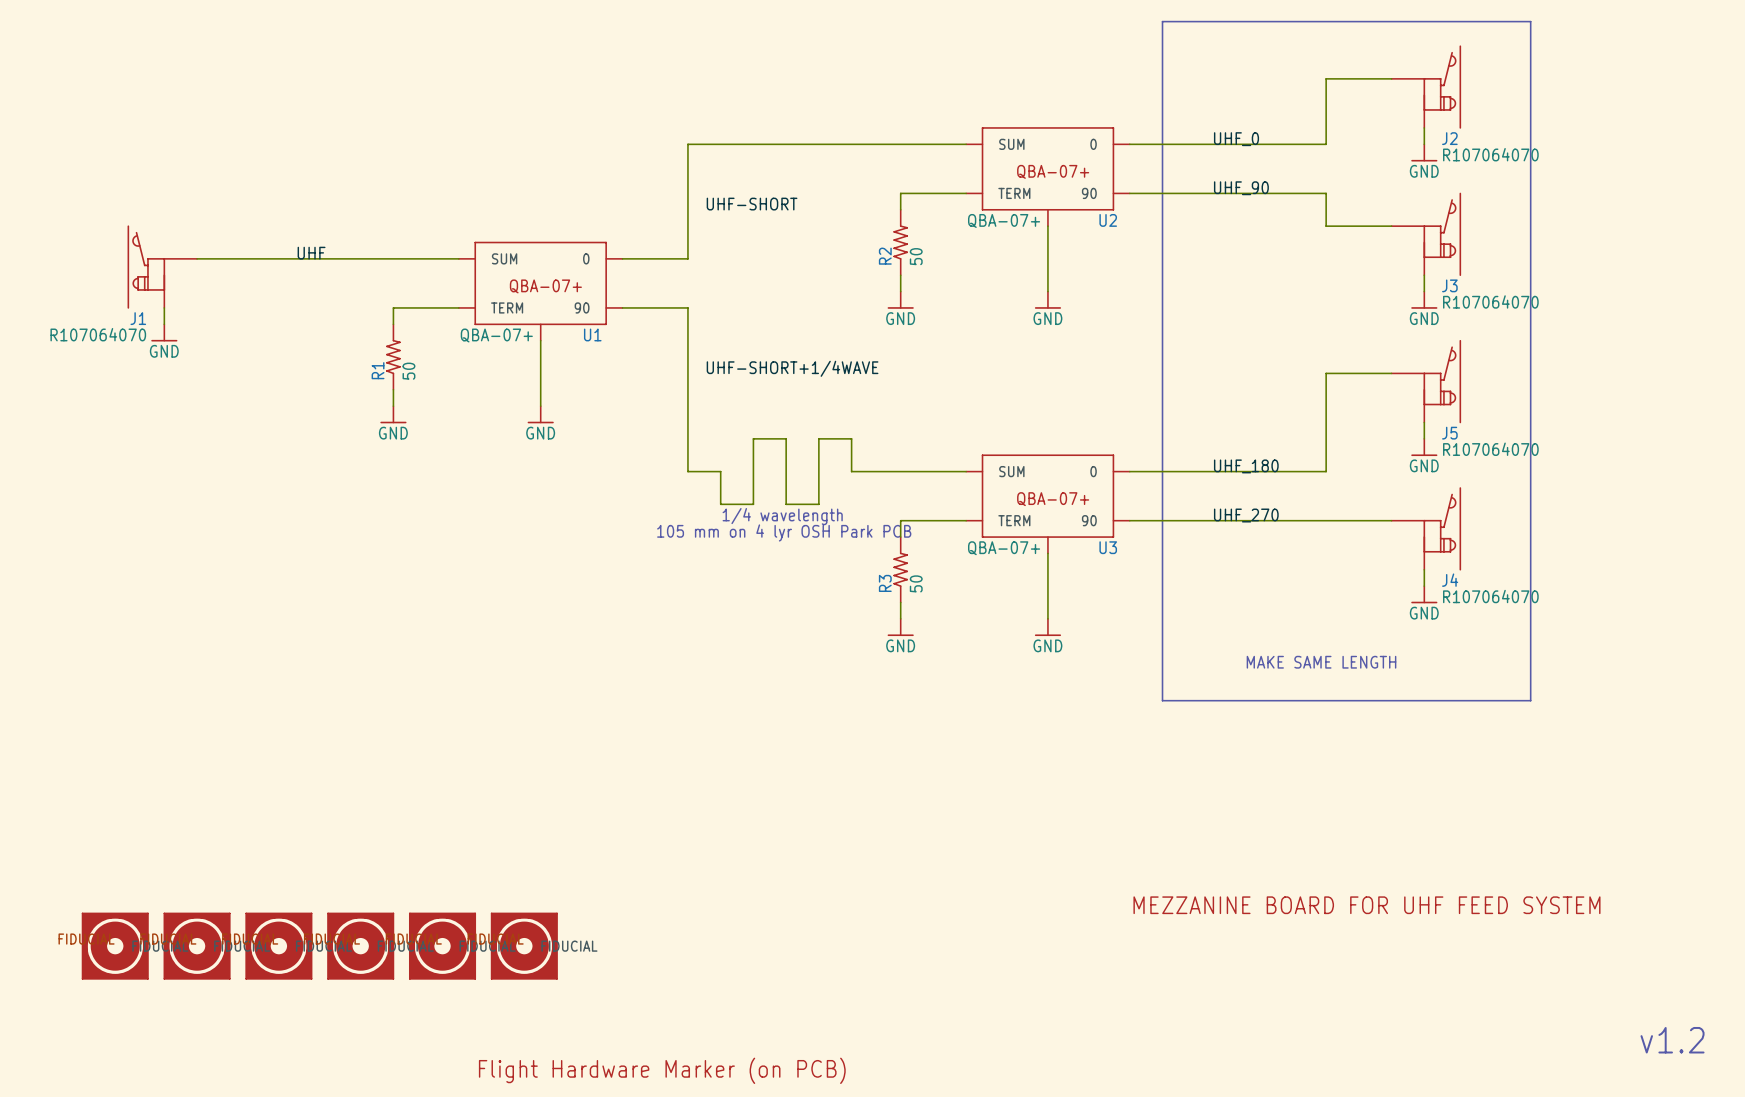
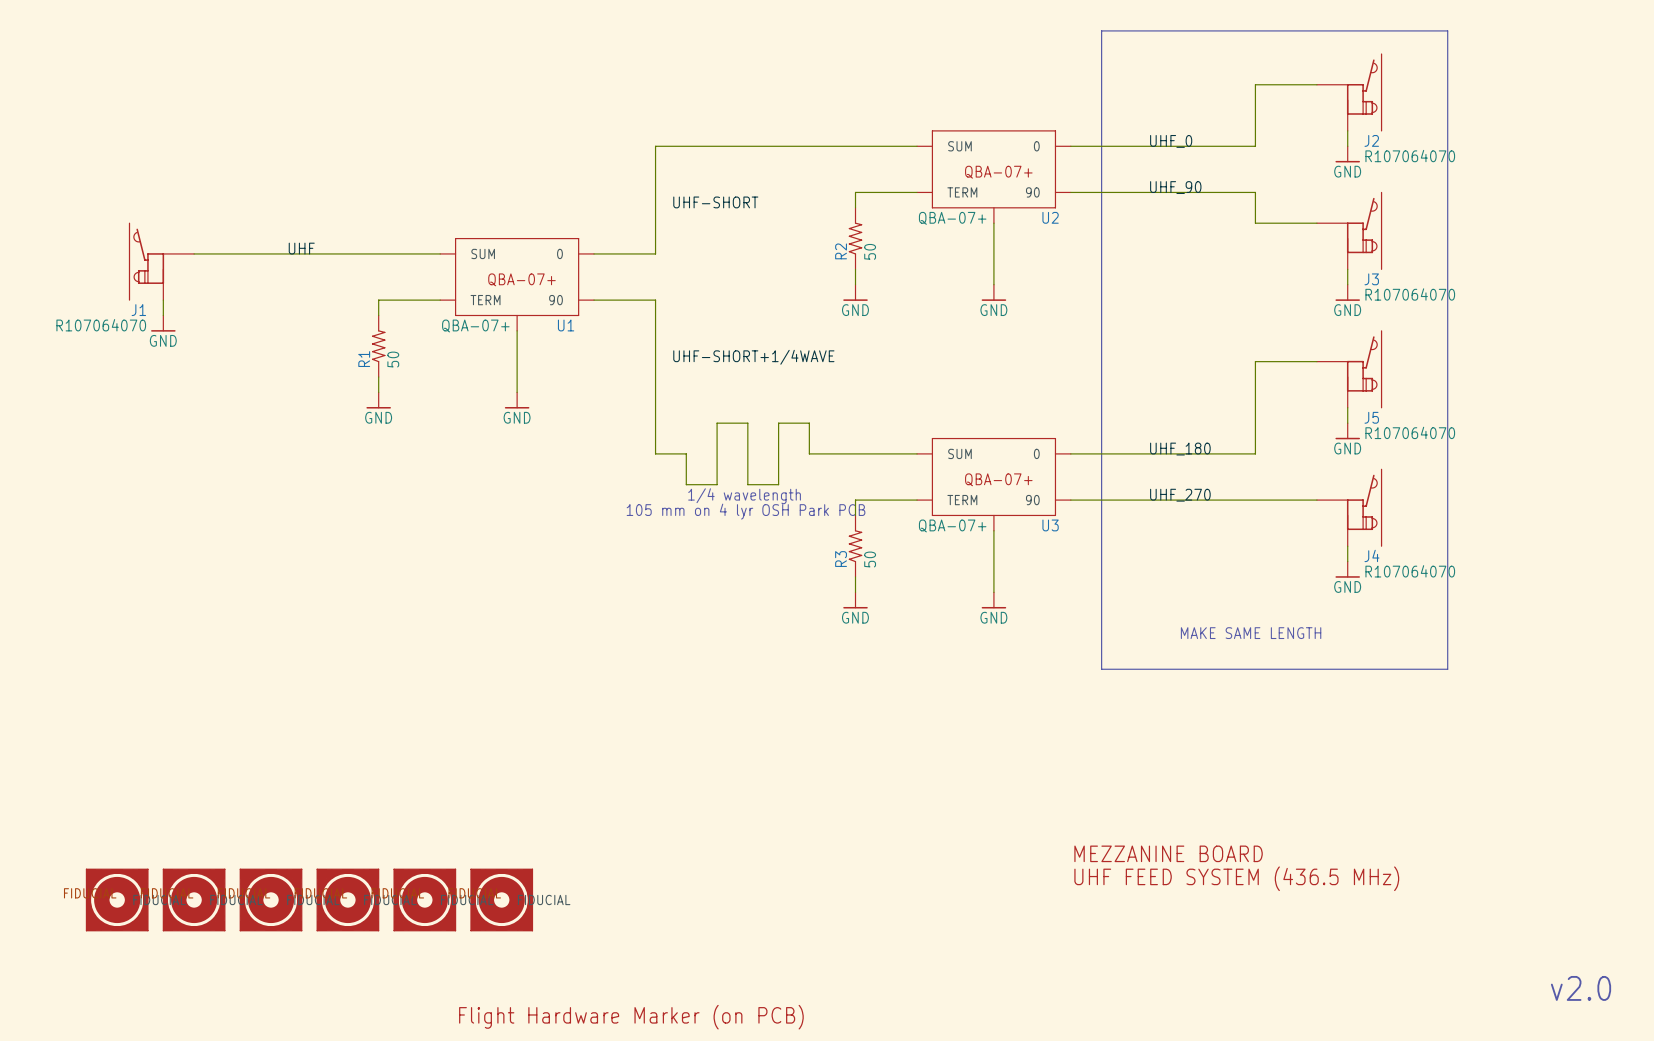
text: none -> MEZZANINE BOARD (1168, 853)
text: MEZZANINE BOARD FOR UHF FEED SYSTEM (1366, 905) -> none
text: none -> UHF FEED SYSTEM (436.5 MHz) (1236, 878)
text: v1.2 (1672, 1040) -> v2.0 (1581, 988)

